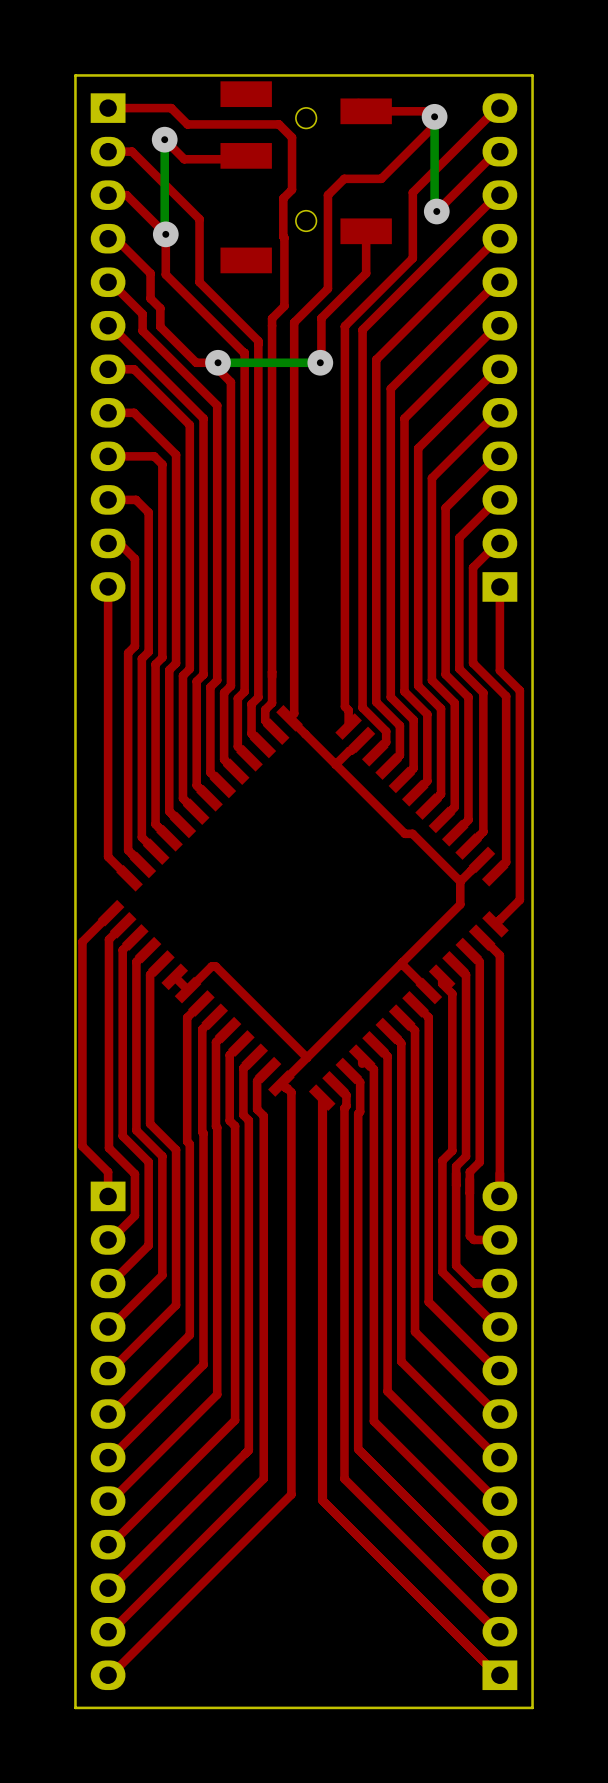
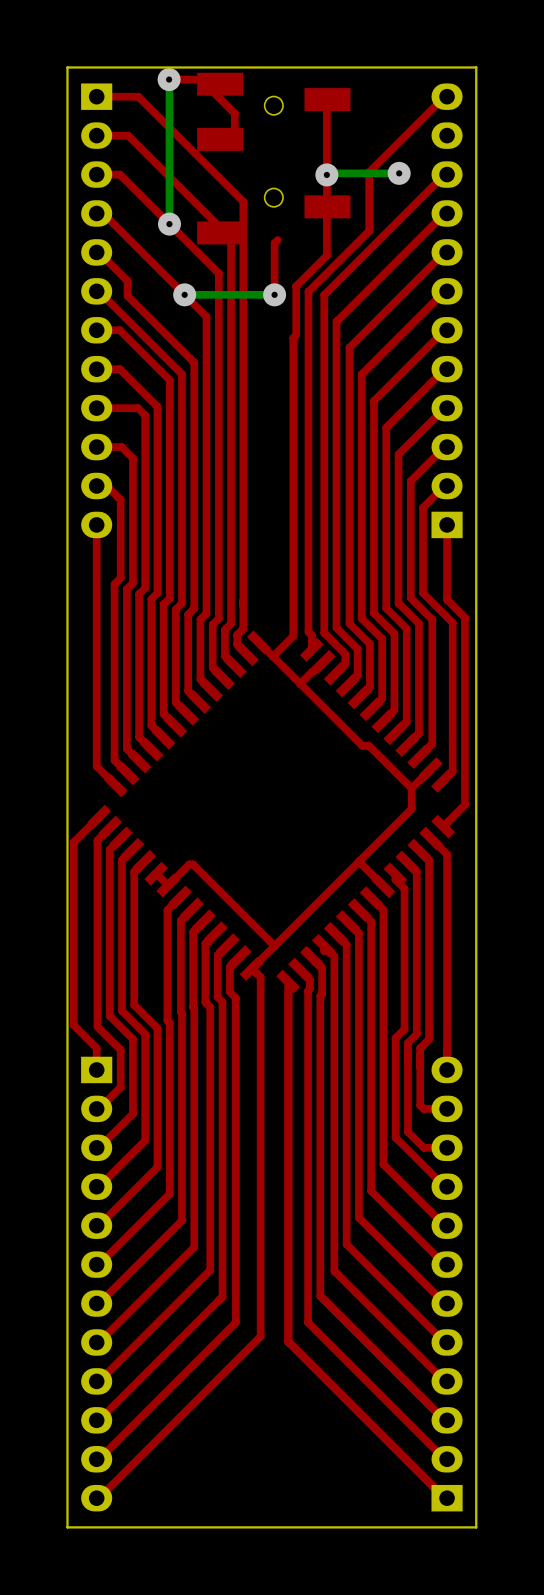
top track: none -> (169, 79) (200, 79) (234, 113) (234, 136)
bottom track: none -> (169, 79) (169, 224)
top track: (154, 108) (171, 108) (187, 124) (278, 124) (292, 137) (292, 189) (283, 198) (284, 306) (272, 318) -> (138, 96) (243, 201) (243, 284)
top track: none -> (326, 98) (326, 255) (296, 286) (296, 335) (293, 338) (293, 636) (273, 656)
top track: (366, 111) (429, 111) (434, 116) (434, 125) (381, 178) (344, 178) (327, 195) (327, 288) (294, 322) (294, 713) (289, 718) -> none
bottom track: (434, 116) (434, 209) (436, 211) -> none
via: (434, 116) -> none
top track: (164, 139) (184, 159) (242, 159) (246, 155) -> none
bottom track: (164, 139) (165, 234) -> none
via position: (164, 139) -> (169, 79)
top track: (132, 151) (199, 219) (199, 282) (258, 341) -> (118, 135) (128, 135) (227, 234)
top track: (496, 151) (436, 211) -> none
bottom track: none -> (399, 173) (328, 173) (326, 174)
top track: (126, 195) (165, 234) (165, 274) (244, 353) -> (113, 174) (119, 174) (218, 273) (218, 315)
via: none -> (326, 174)
via position: (436, 211) -> (399, 173)
top track: (366, 231) (366, 273) (321, 318) (320, 362) -> none
via position: (165, 234) -> (169, 224)
top track: (115, 238) (150, 273) (150, 298) (160, 308) (160, 326) (196, 362) (218, 362) (218, 369) (230, 382) -> (103, 213) (206, 316) (206, 341)
top track: none -> (227, 234) (231, 238) (231, 305)
top track: none -> (277, 239) (274, 243) (274, 294)
bottom track: none -> (274, 294) (184, 294)
via position: (218, 362) -> (184, 294)
bottom track: (320, 362) (218, 362) -> none
via position: (320, 362) -> (274, 294)

